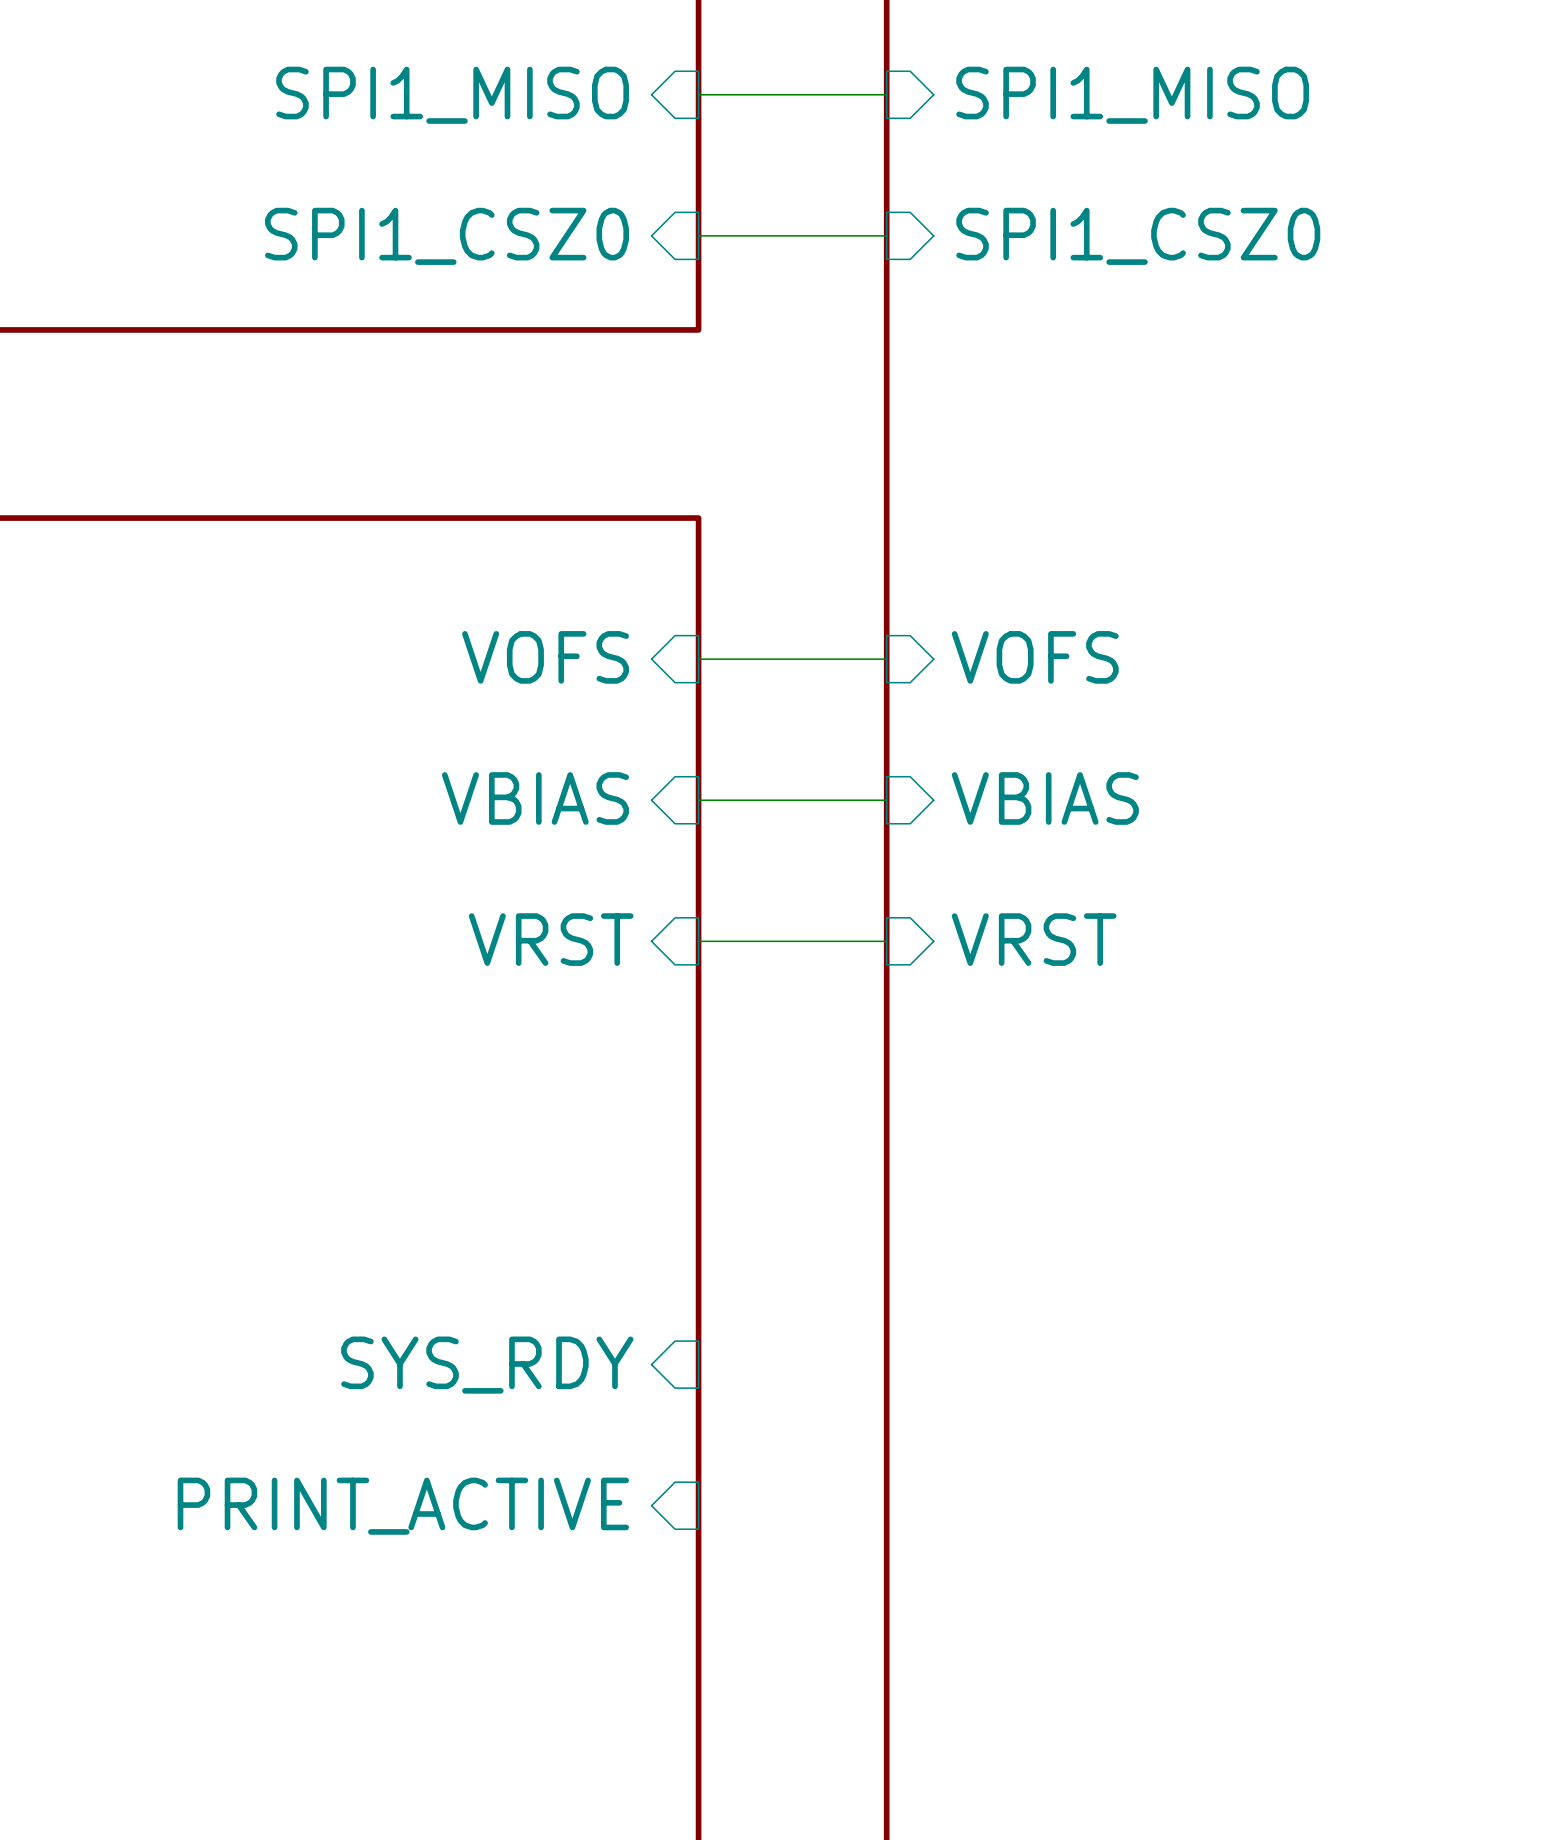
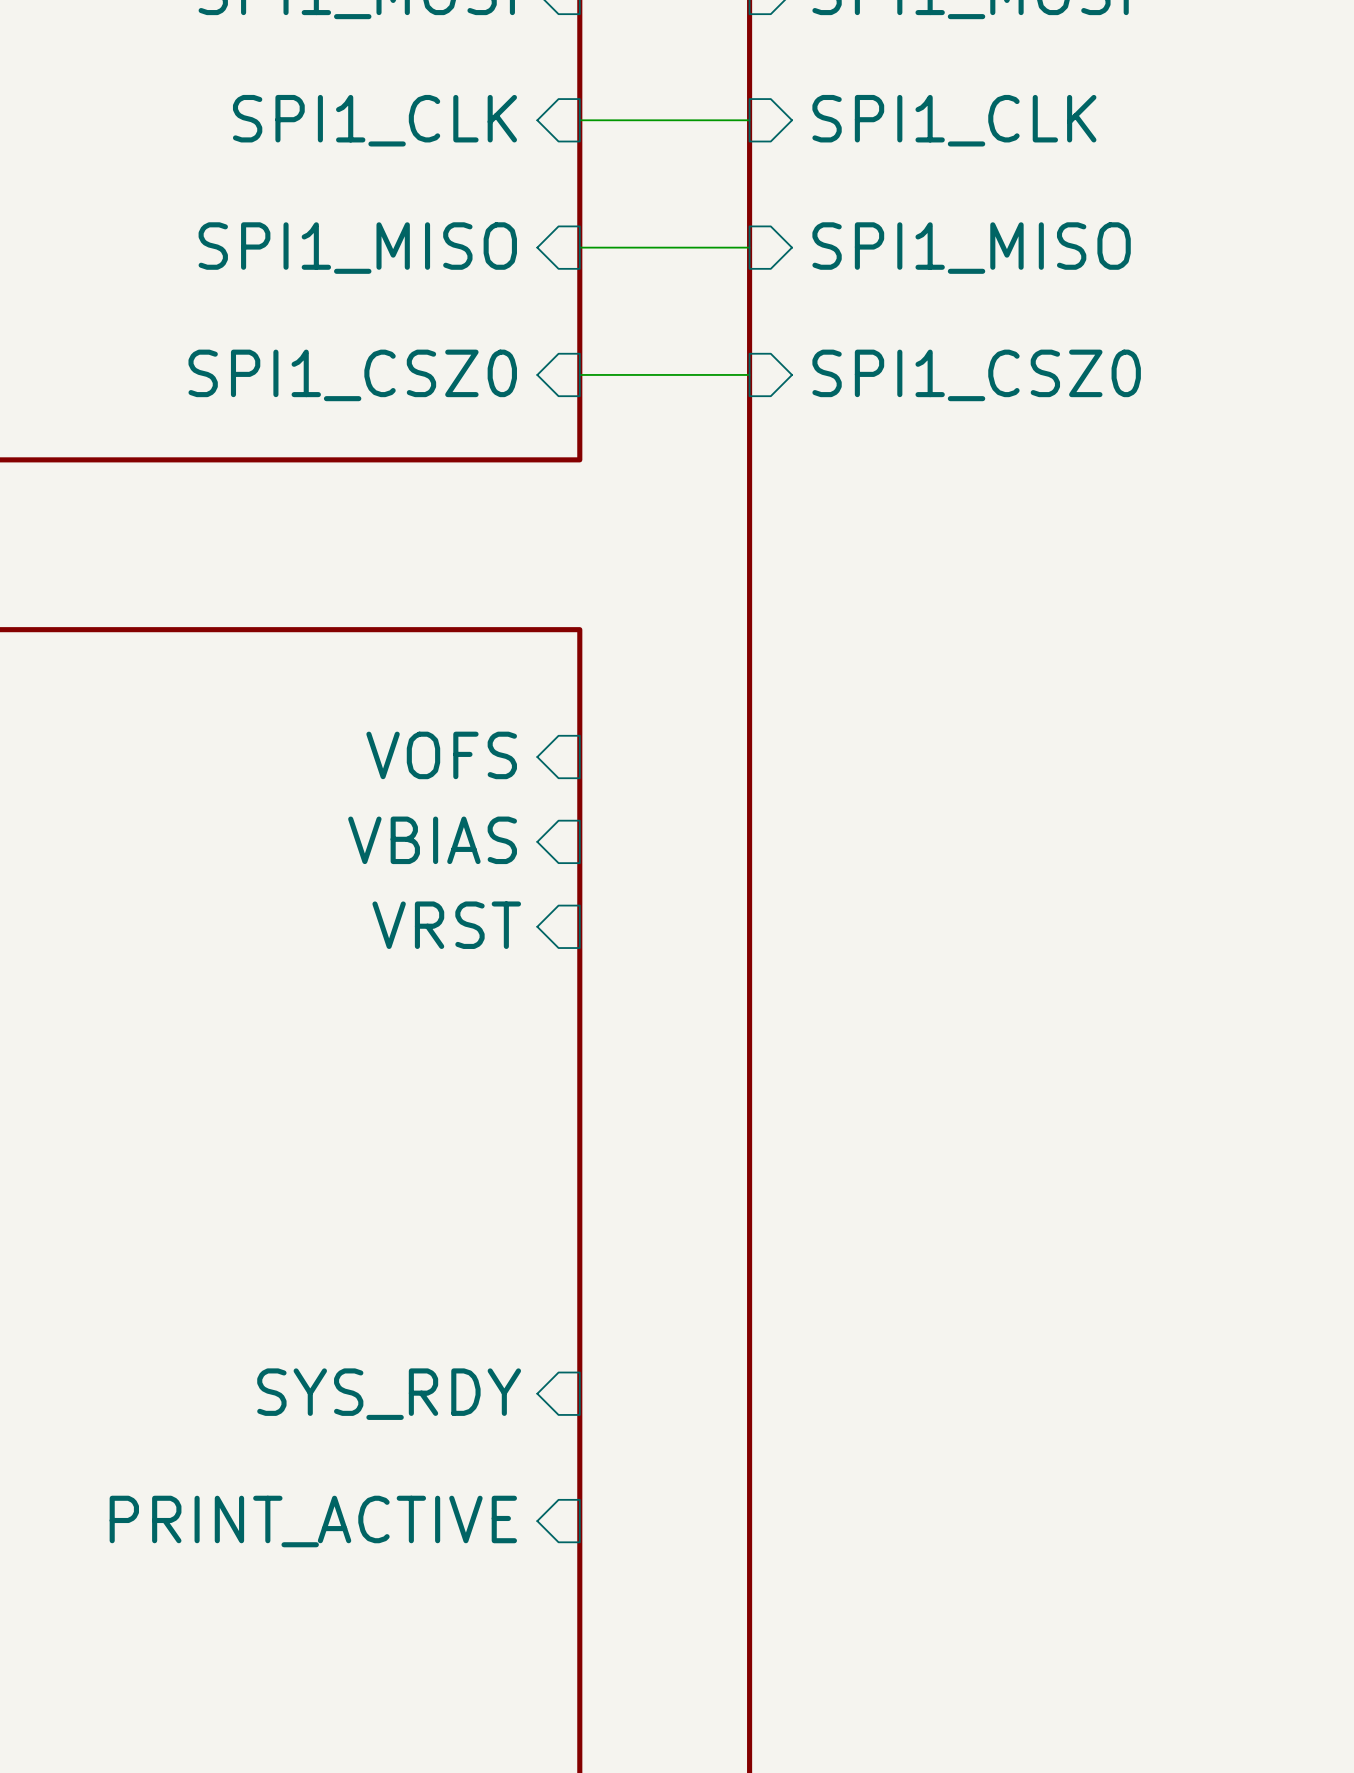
sheet pin: VOFS (1035, 657) -> none
wire: (698, 659) (886, 659) -> none
sheet pin position: VBIAS (535, 798) -> VBIAS (432, 840)
sheet pin: VBIAS (1045, 798) -> none
wire: (698, 800) (886, 800) -> none
sheet pin position: VRST (551, 939) -> VRST (446, 925)
sheet pin: VRST (1034, 939) -> none
wire: (698, 941) (886, 941) -> none

